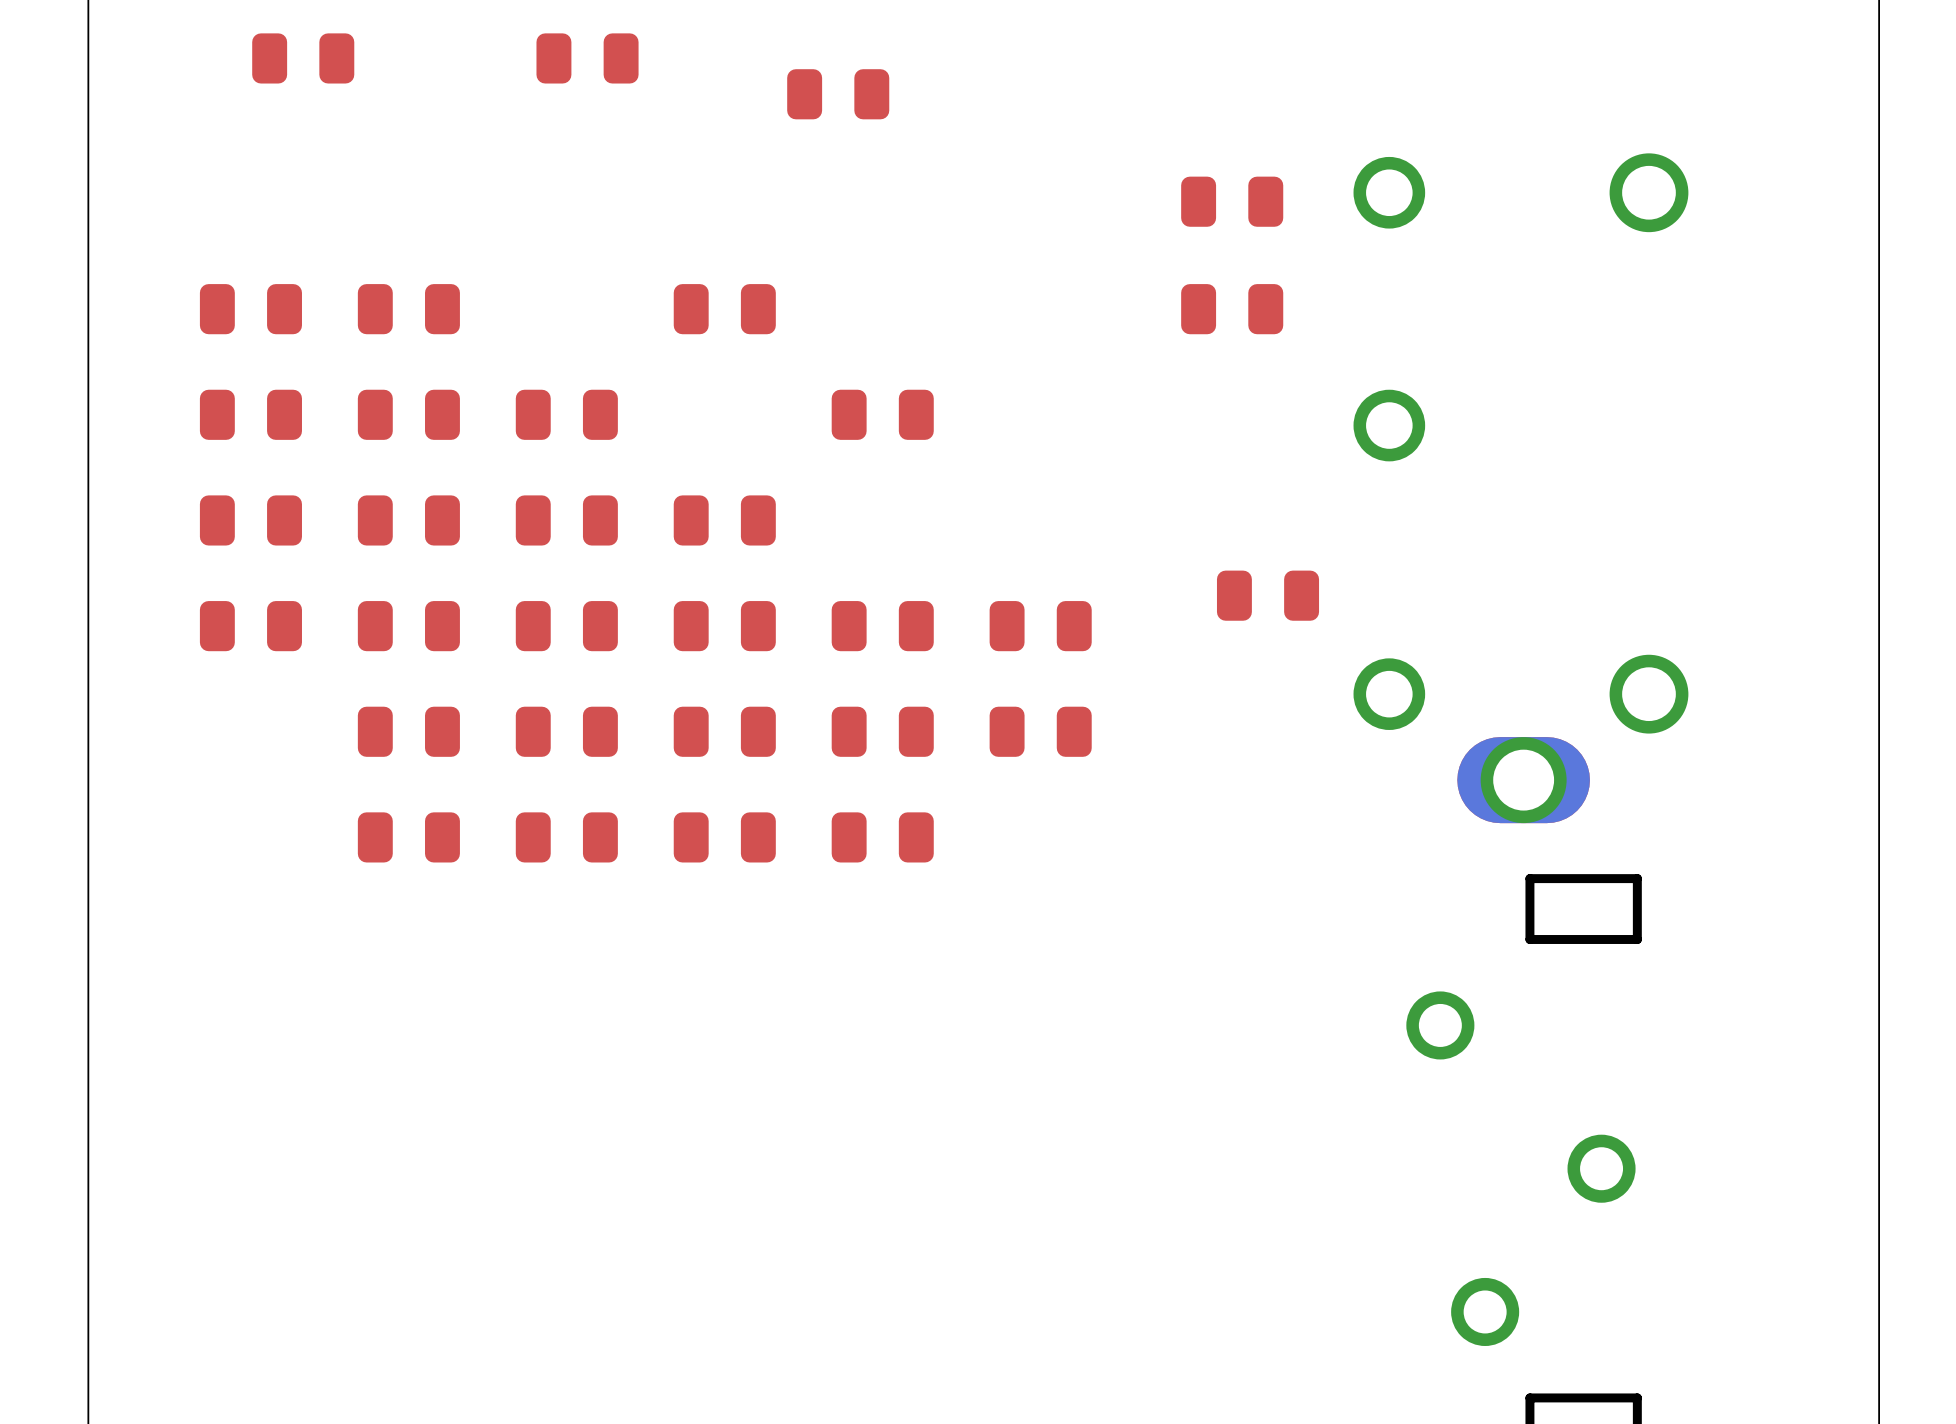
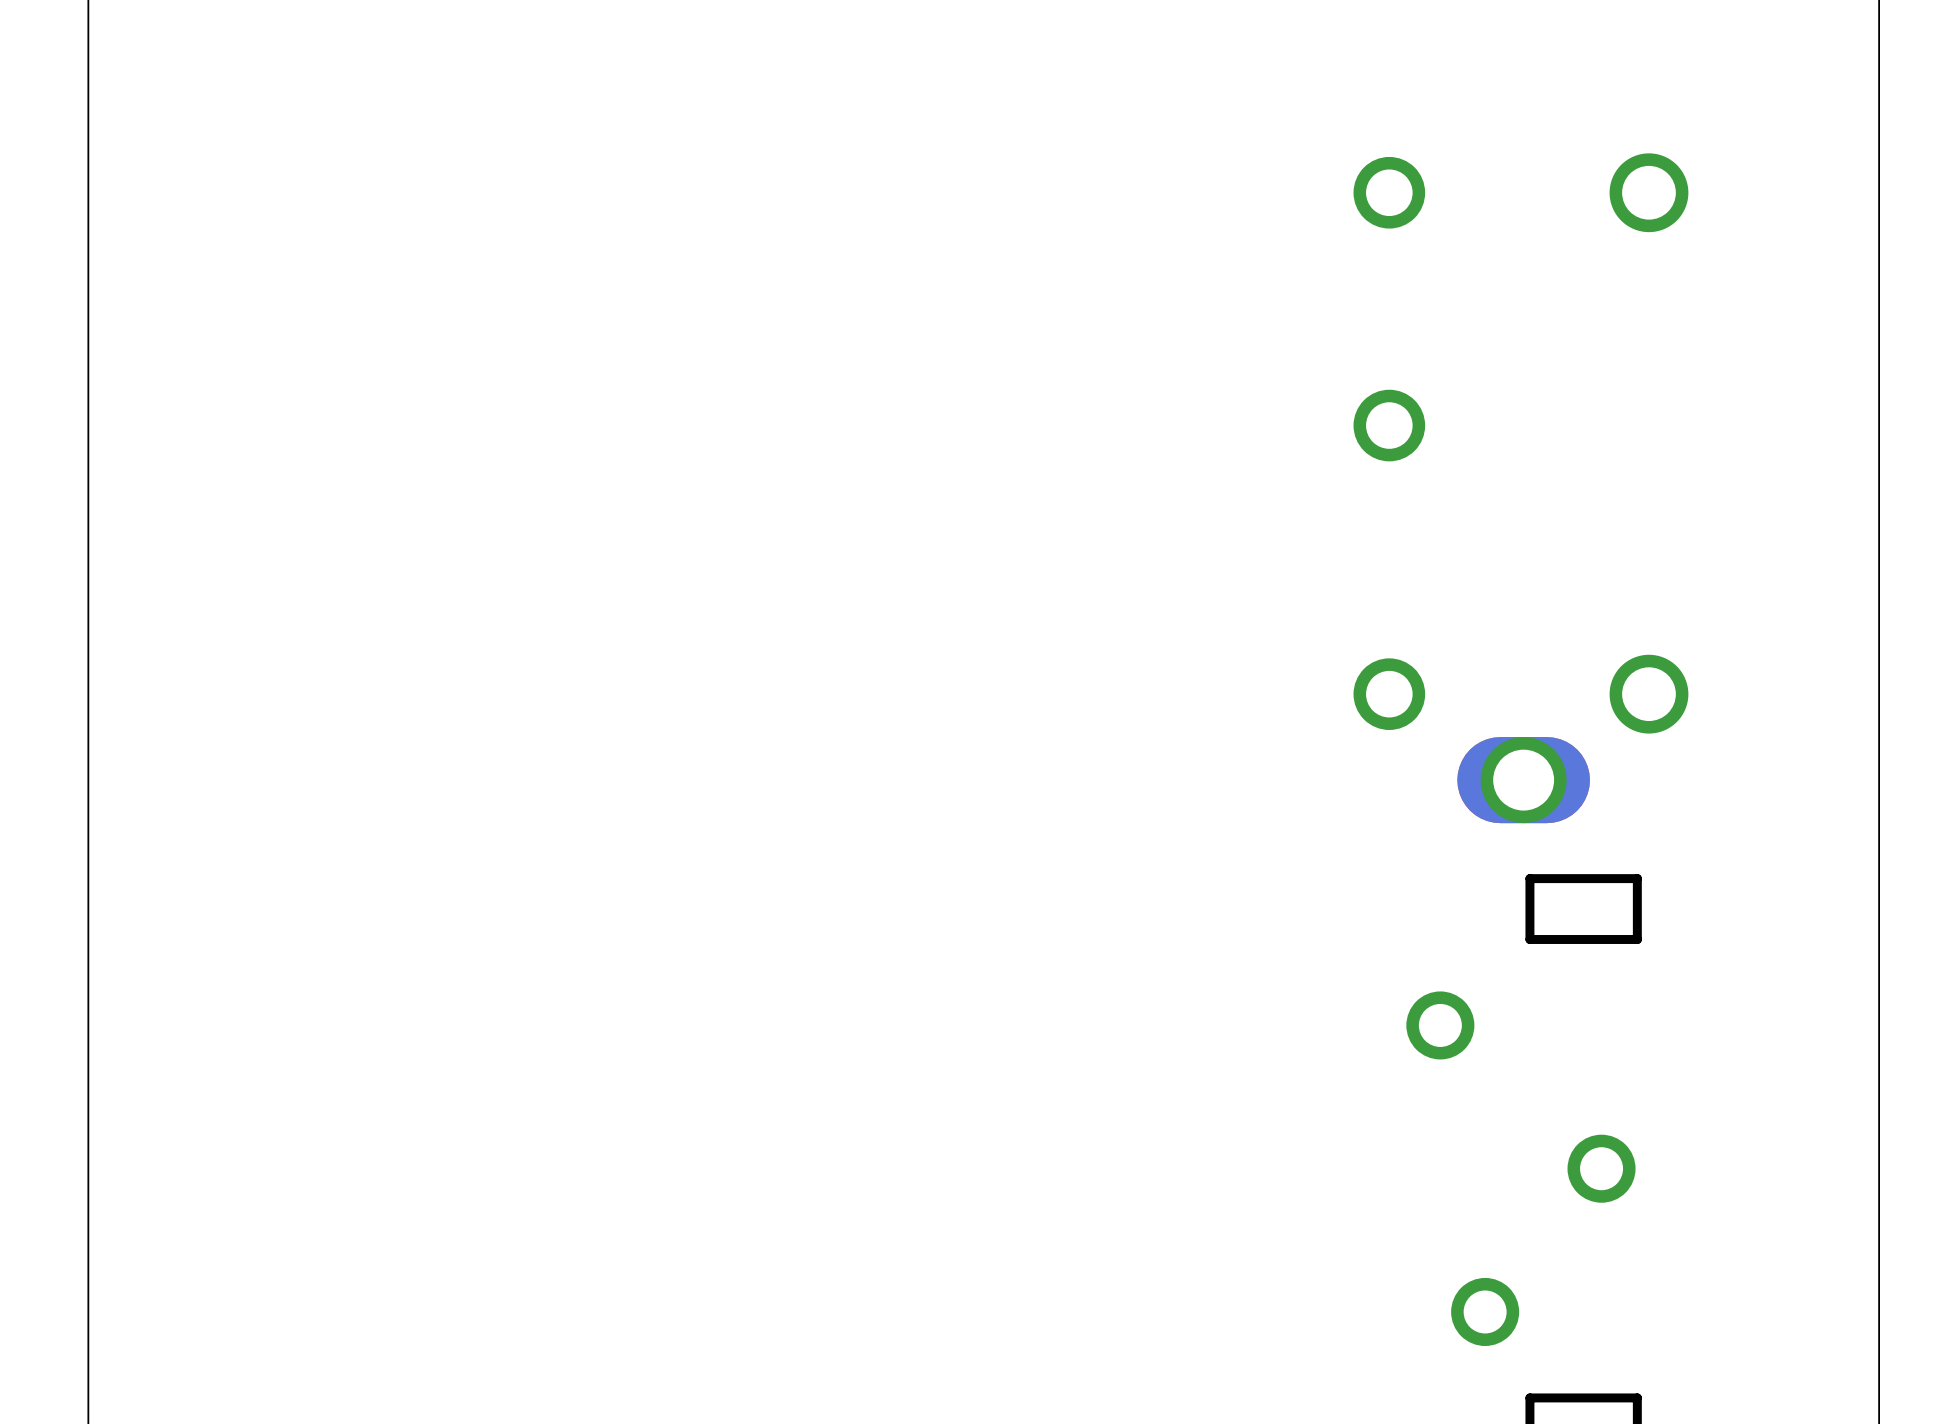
part: (303, 58) -> none
part: (587, 58) -> none
part: (838, 94) -> none
part: (1232, 201) -> none
part: (250, 309) -> none
part: (408, 309) -> none
part: (724, 309) -> none
part: (1232, 309) -> none
part: (250, 414) -> none
part: (408, 414) -> none
part: (566, 414) -> none
part: (882, 414) -> none
part: (250, 520) -> none
part: (408, 520) -> none
part: (566, 520) -> none
part: (724, 520) -> none
part: (1268, 595) -> none
part: (250, 626) -> none
part: (408, 626) -> none
part: (566, 626) -> none
part: (724, 626) -> none
part: (882, 626) -> none
part: (1040, 626) -> none
part: (408, 731) -> none
part: (566, 731) -> none
part: (724, 731) -> none
part: (882, 731) -> none
part: (1040, 731) -> none
part: (408, 837) -> none
part: (566, 837) -> none
part: (724, 837) -> none
part: (882, 837) -> none

